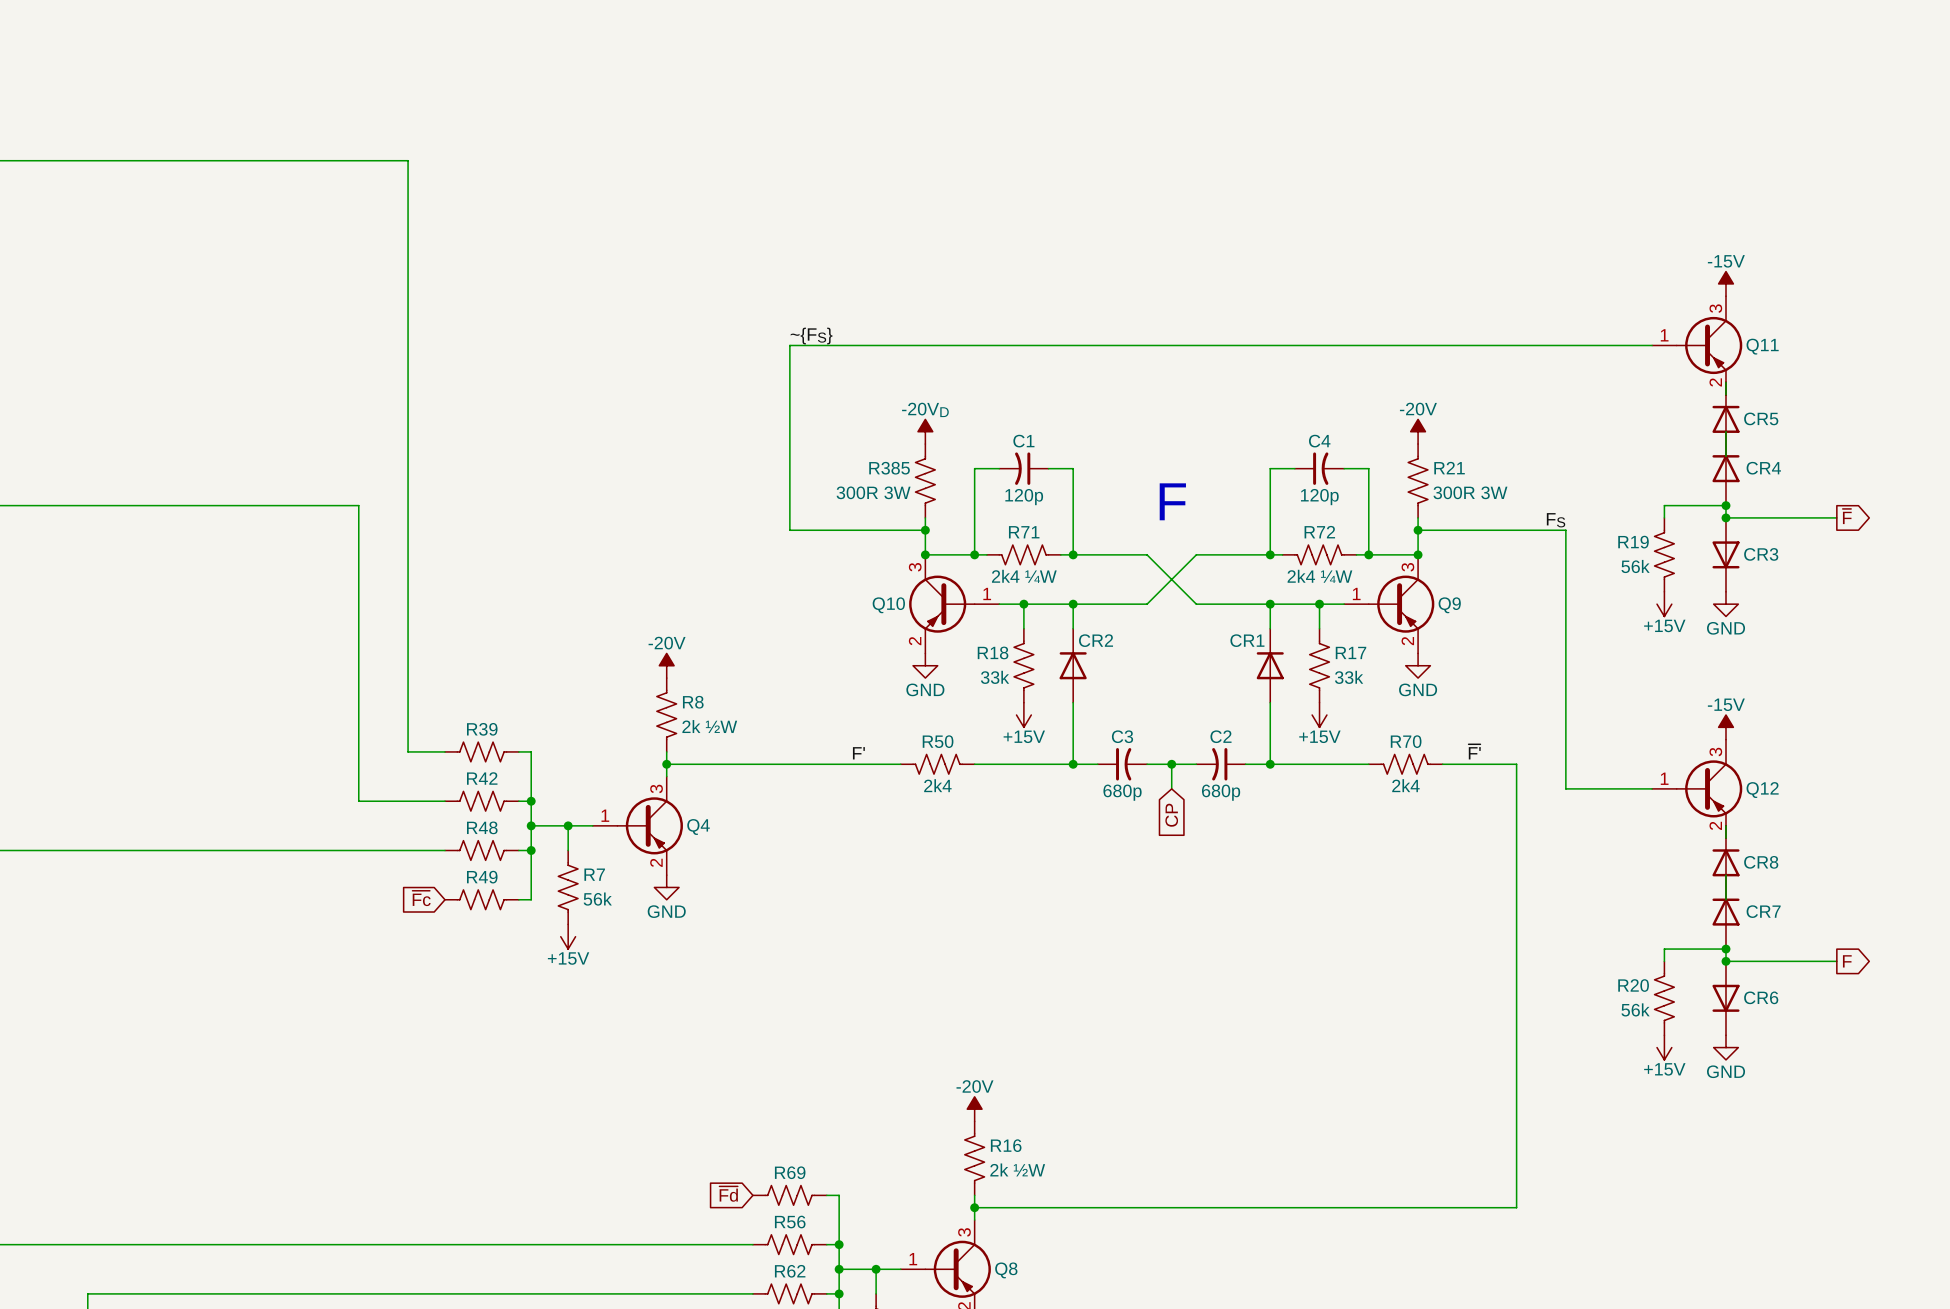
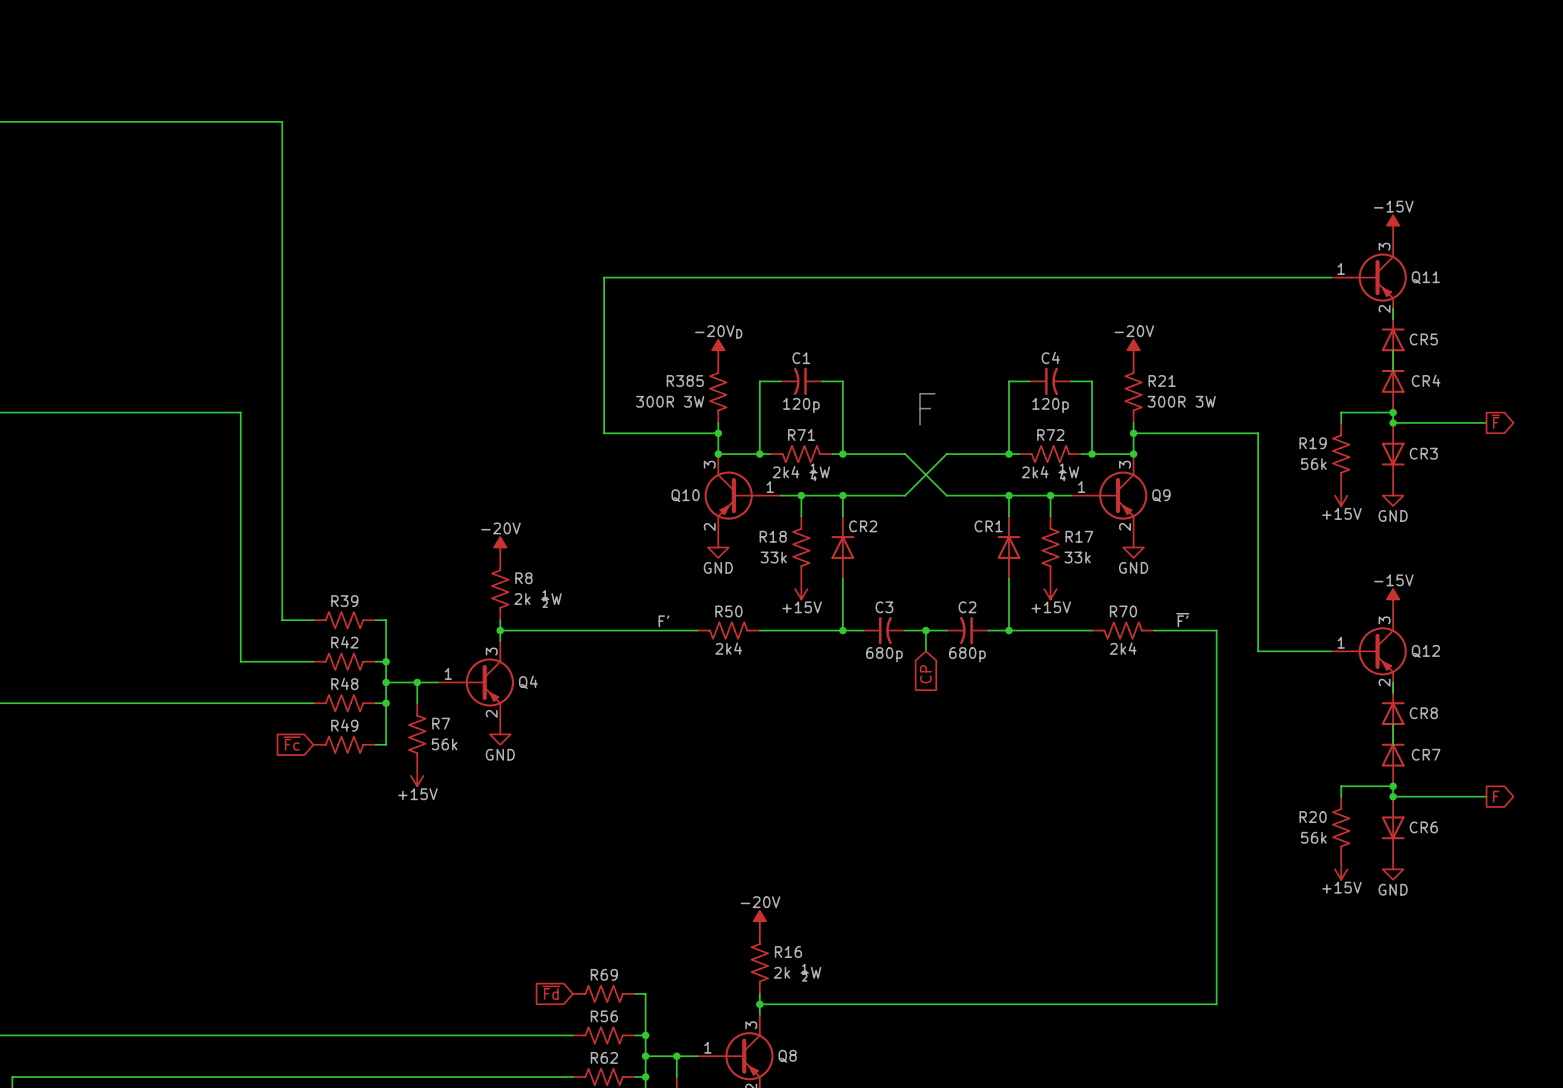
label: ~{FS} (811, 336) -> none
label: FS (1556, 520) -> none

